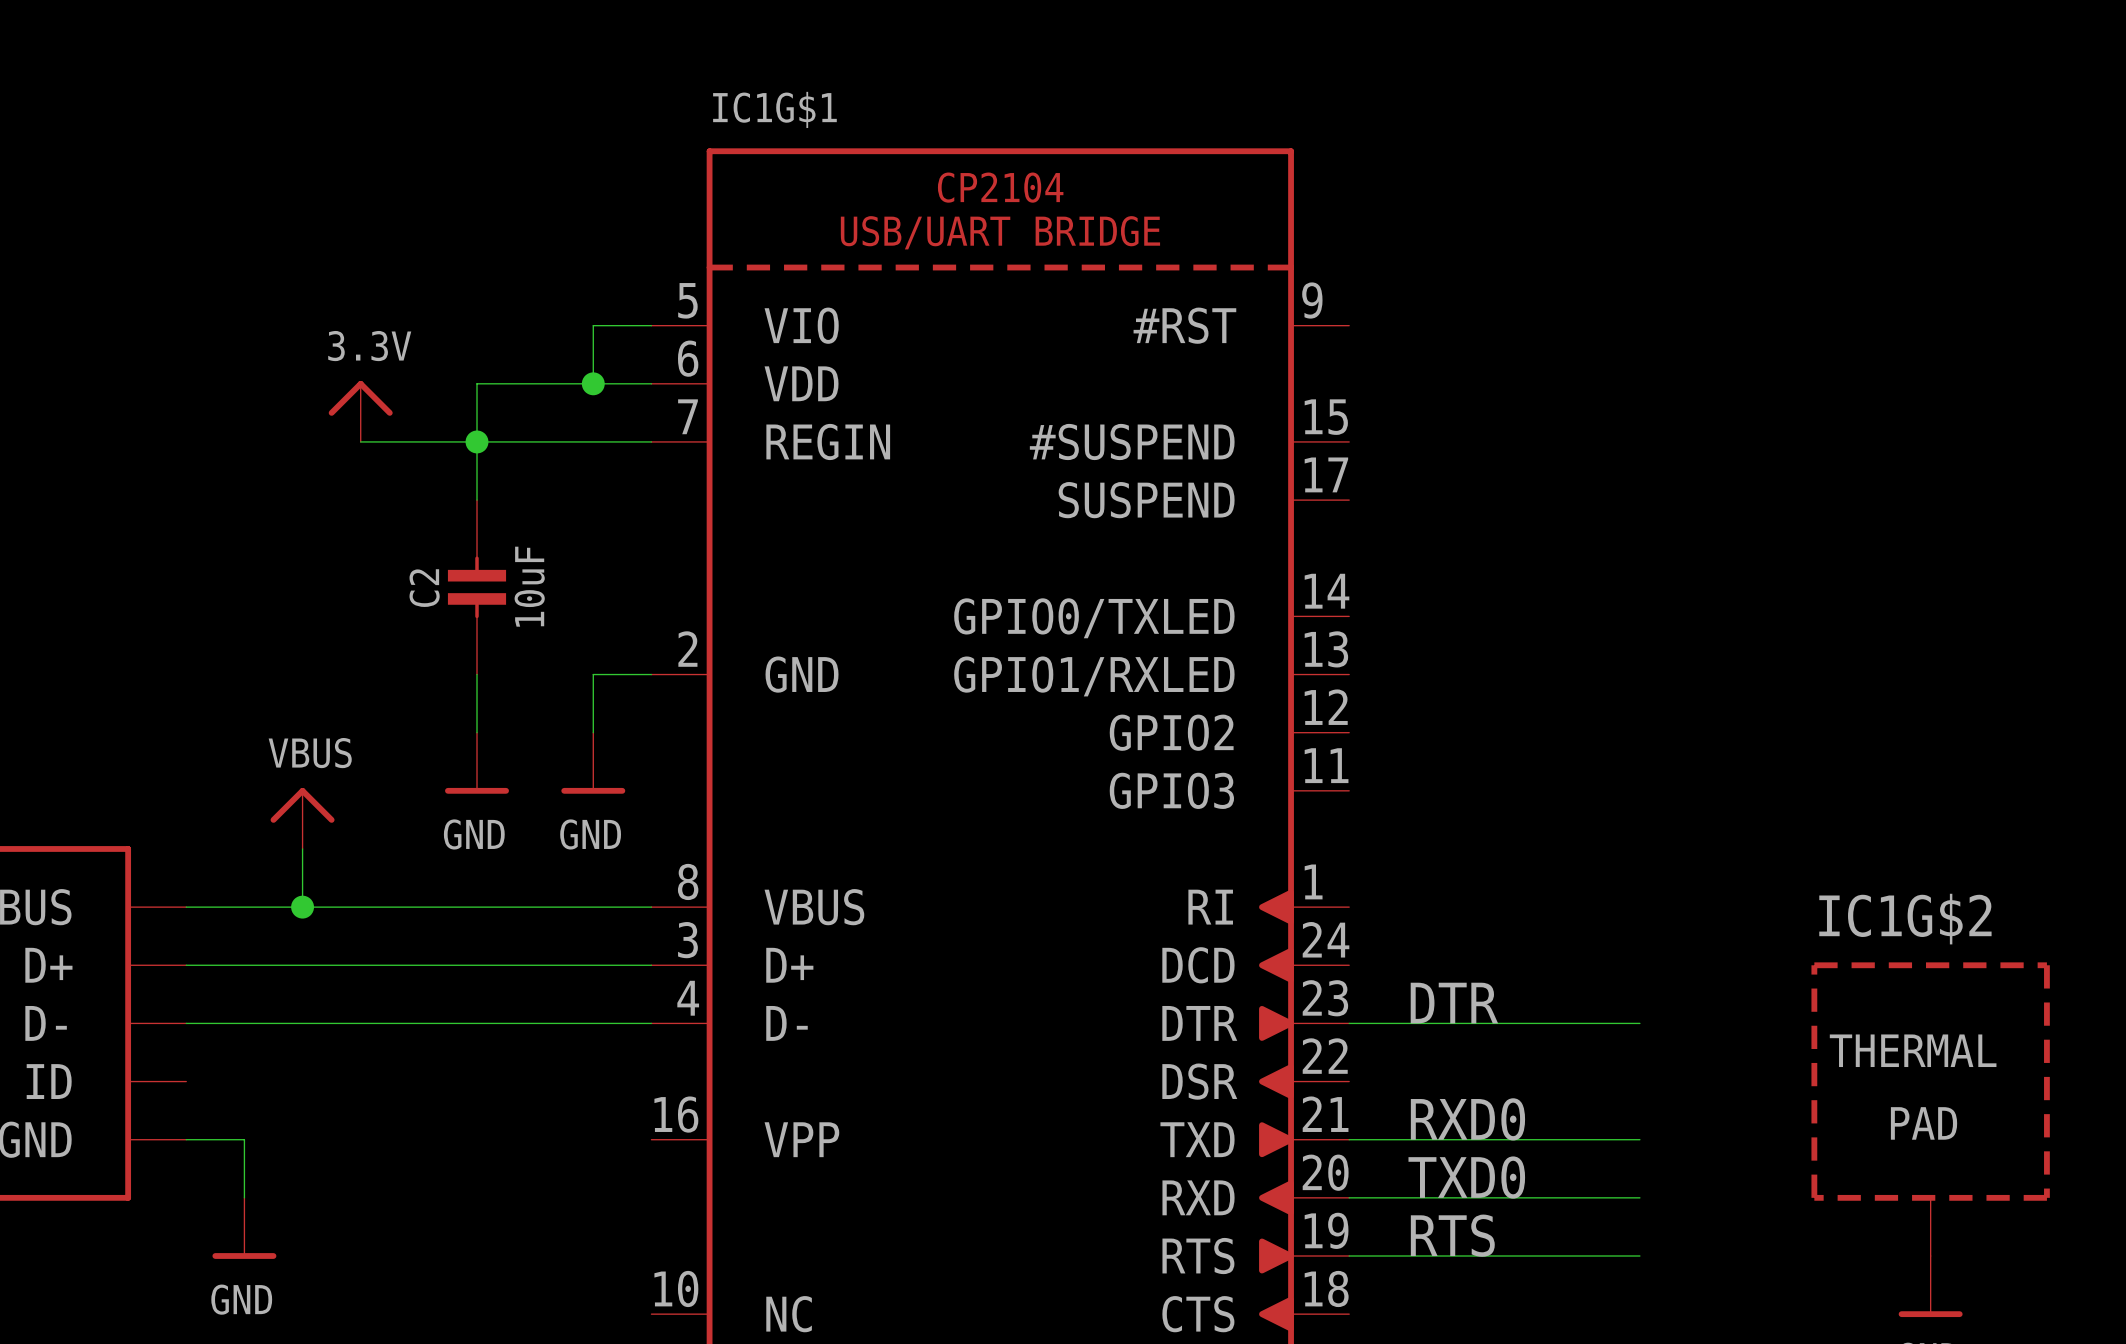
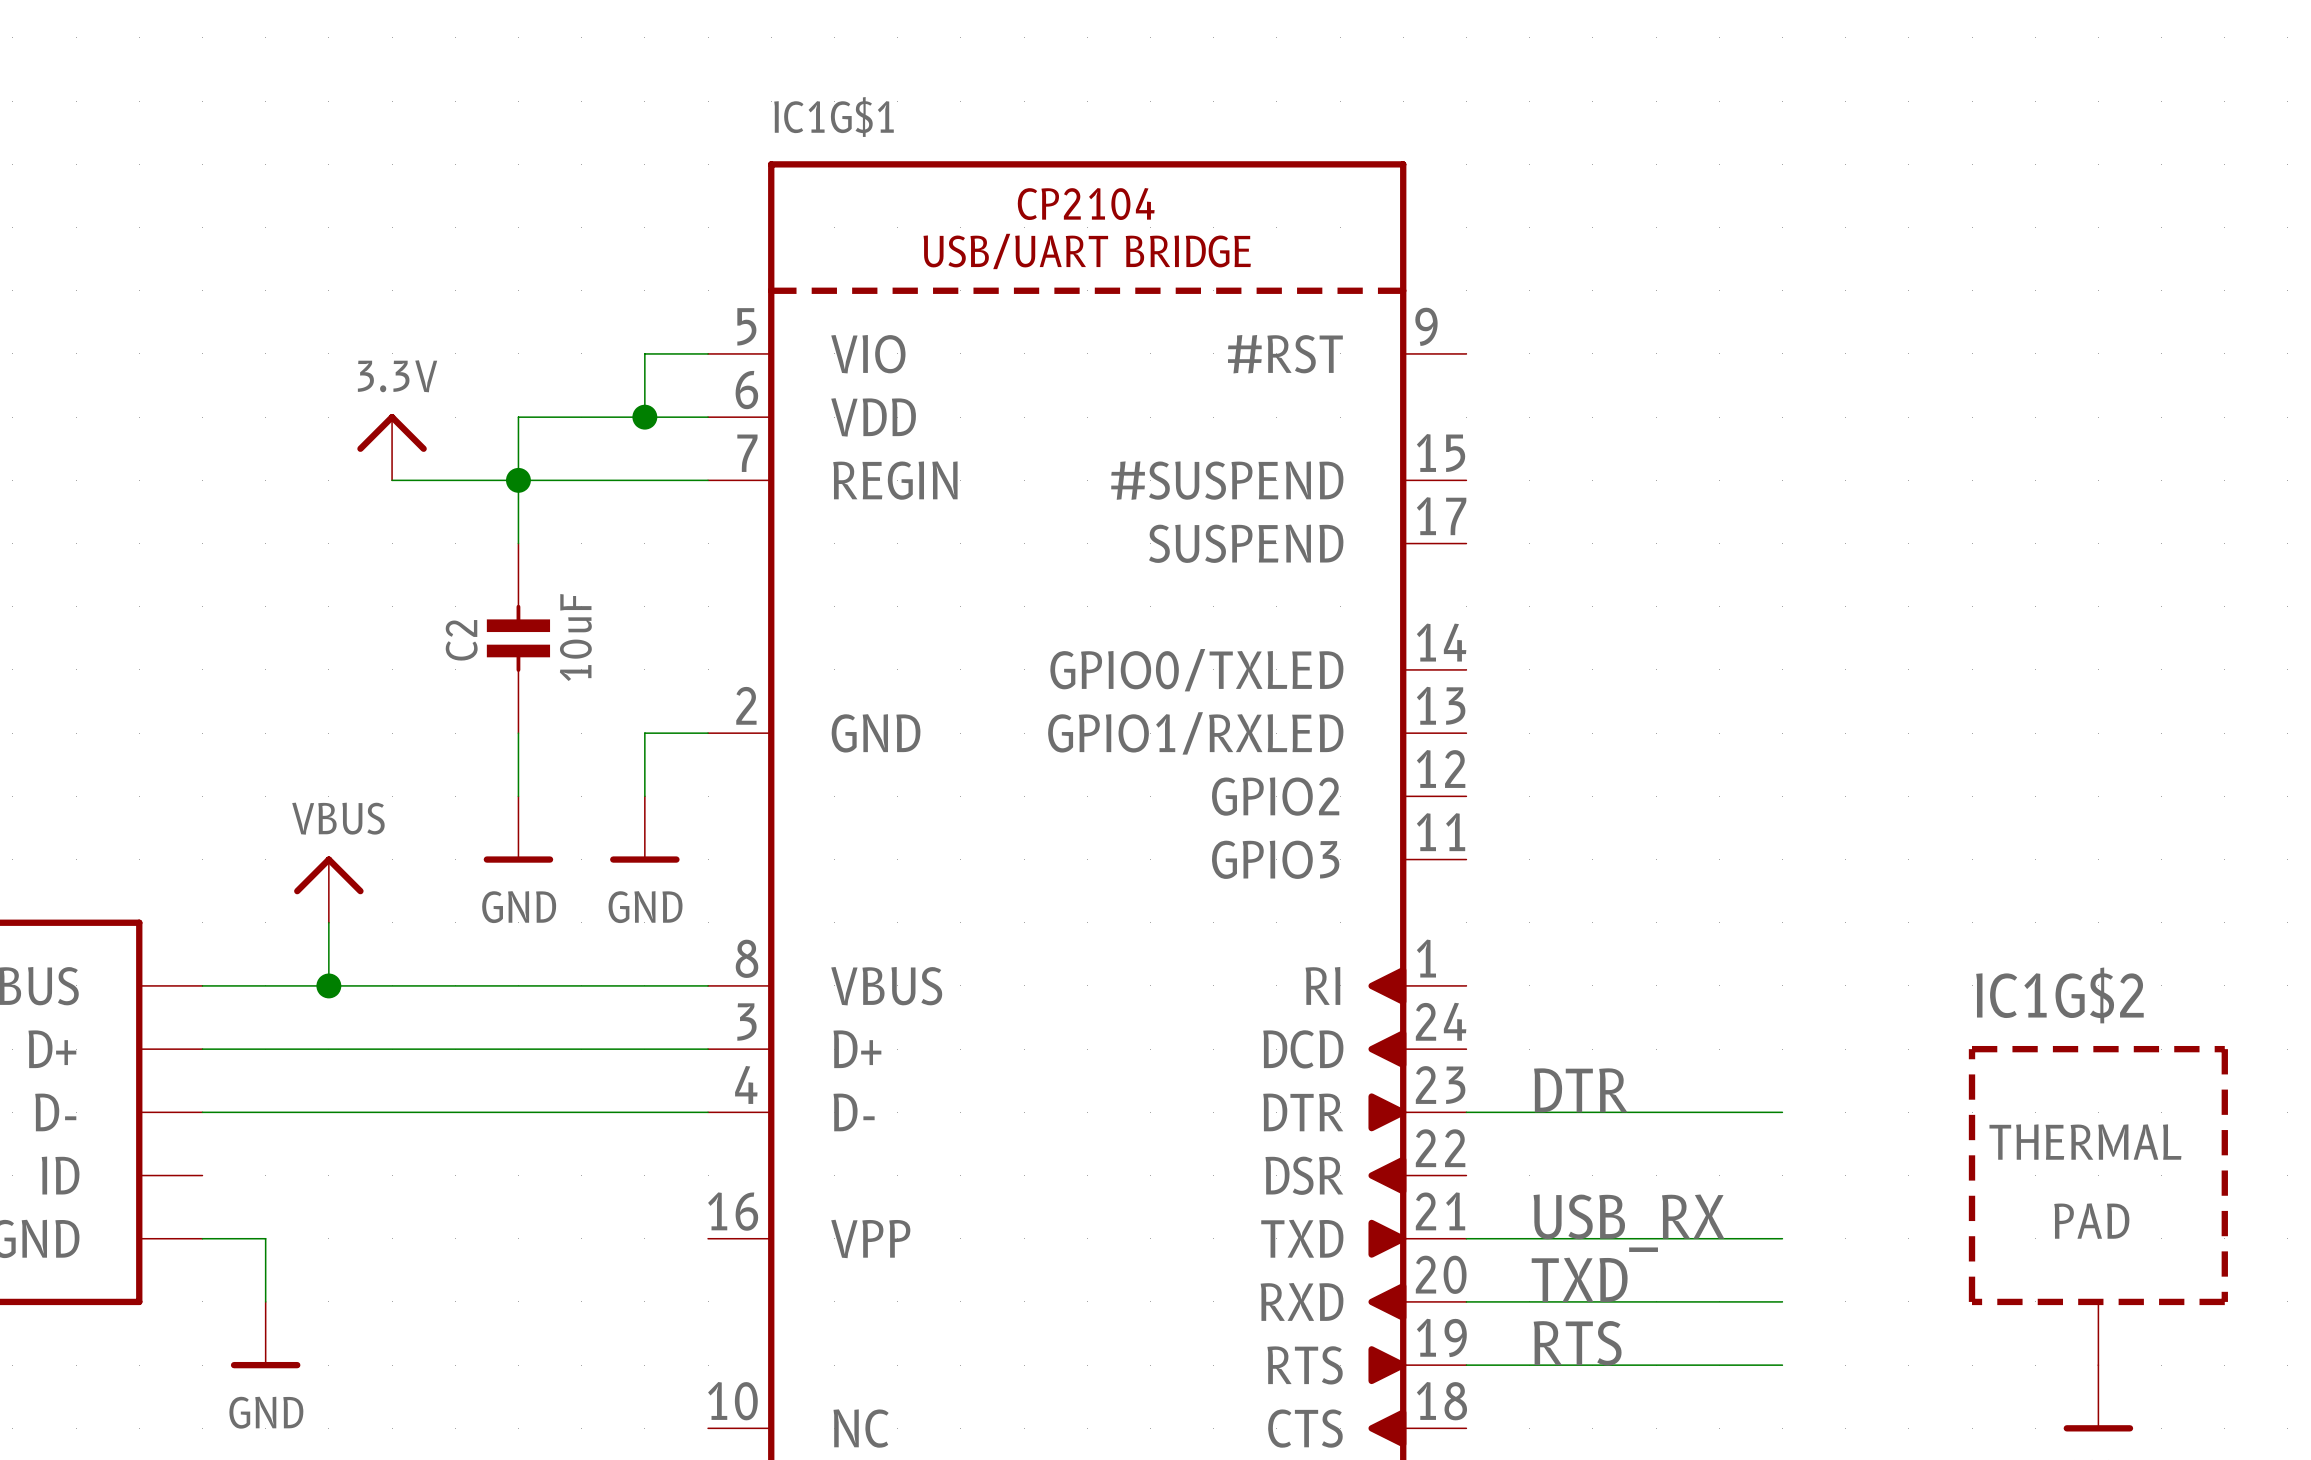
label: RXD0 (1467, 1119) -> USB_RX (1628, 1223)
label: TXD0 (1466, 1177) -> TXD (1579, 1279)

